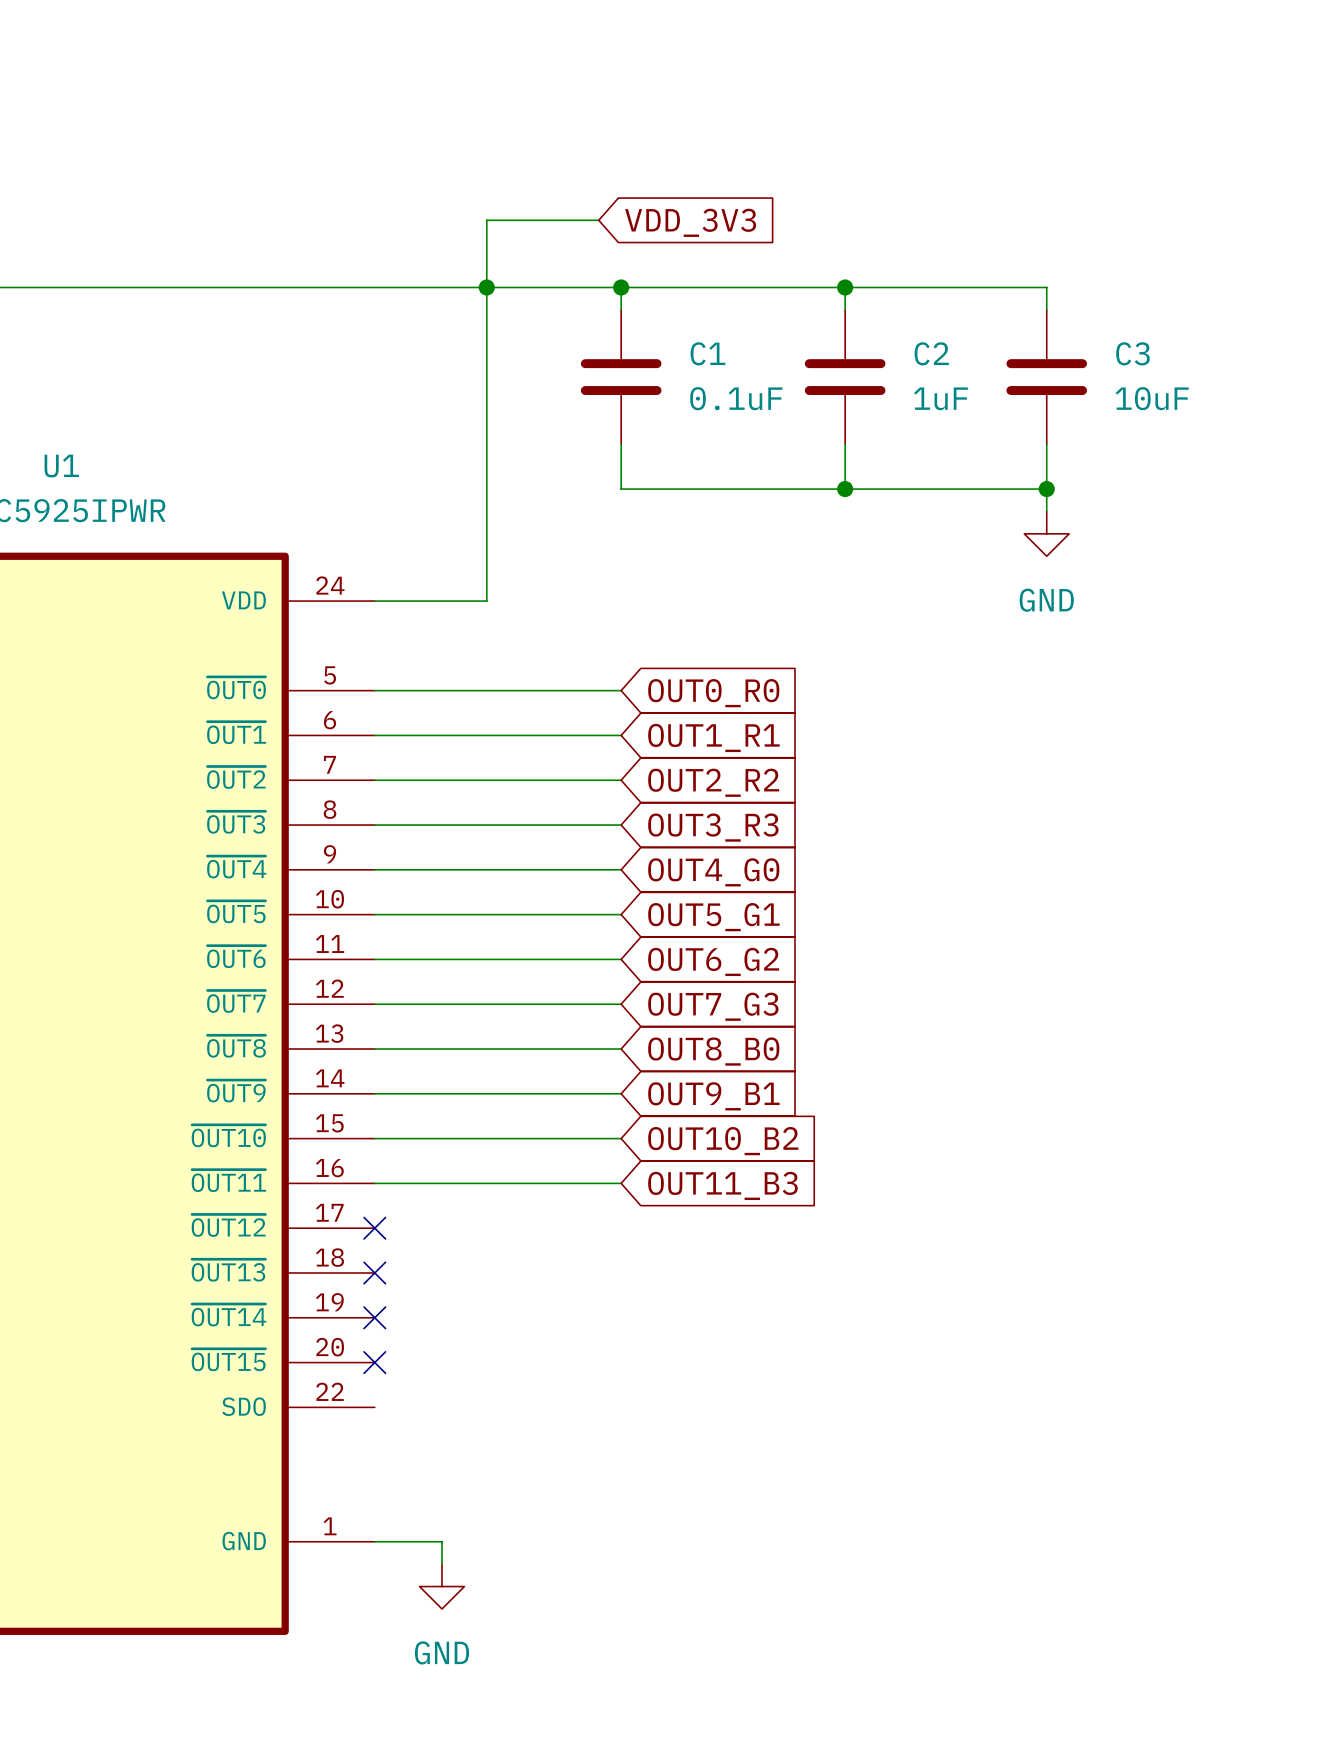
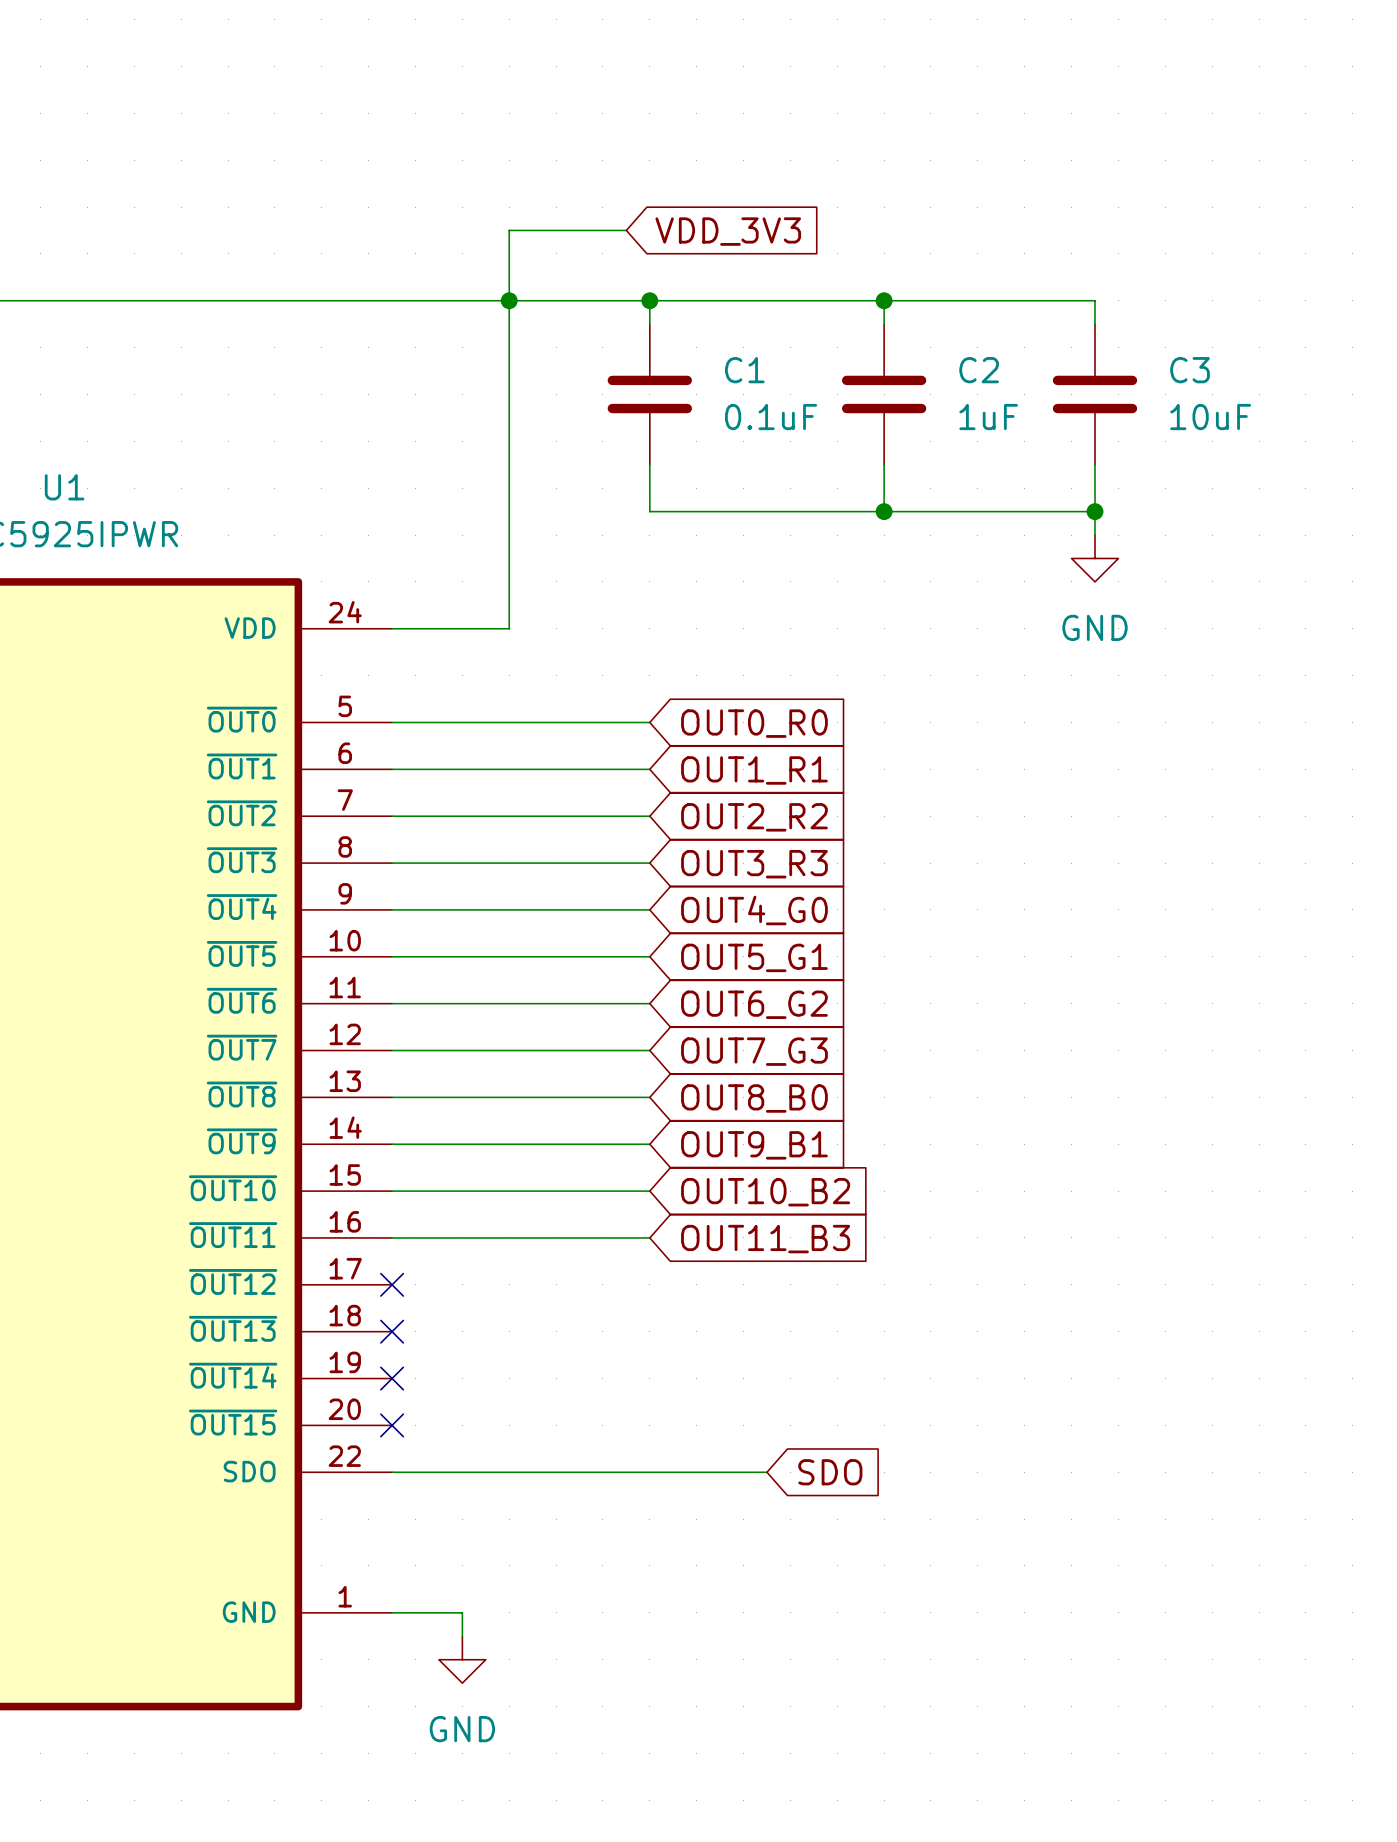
wire: none -> (392, 1472) (766, 1472)
global label: none -> SDO (830, 1472)

